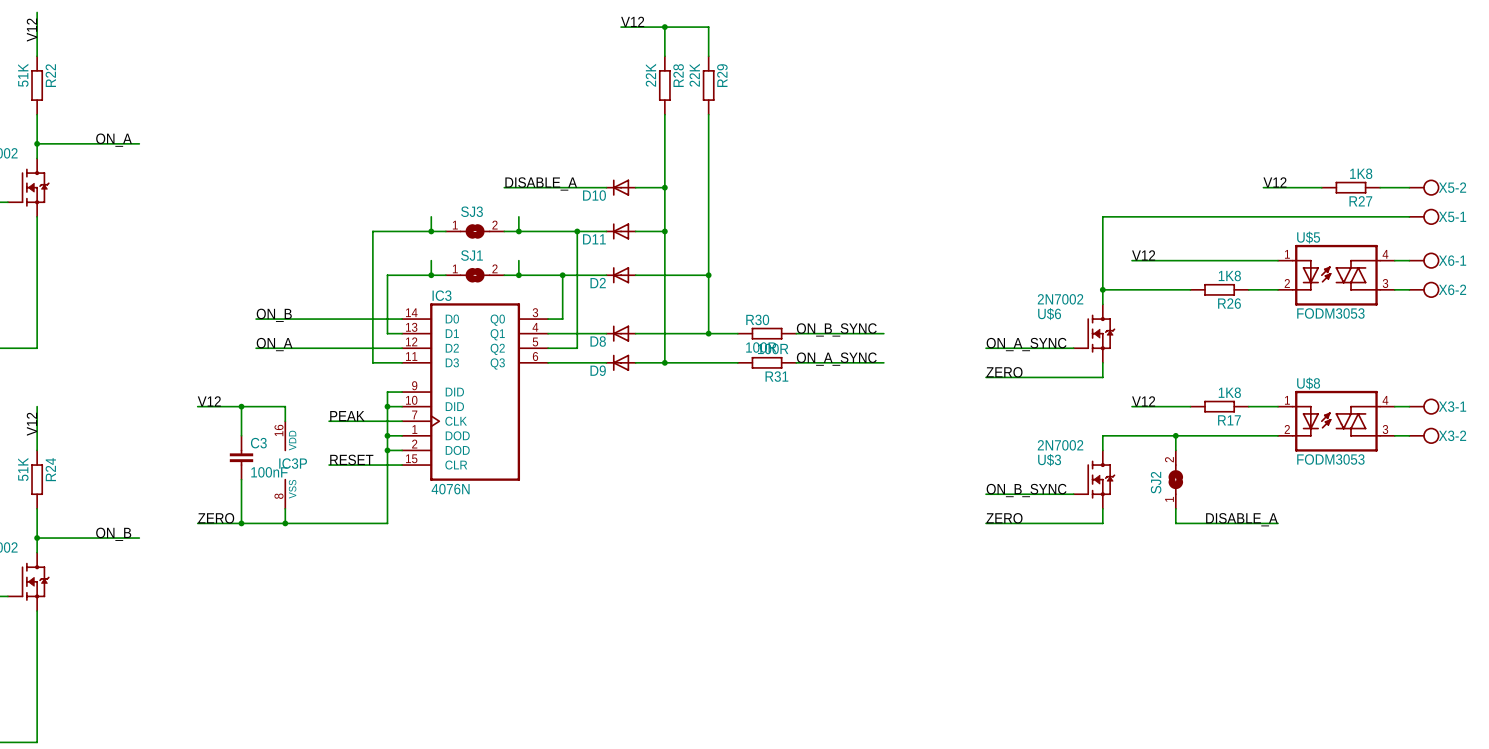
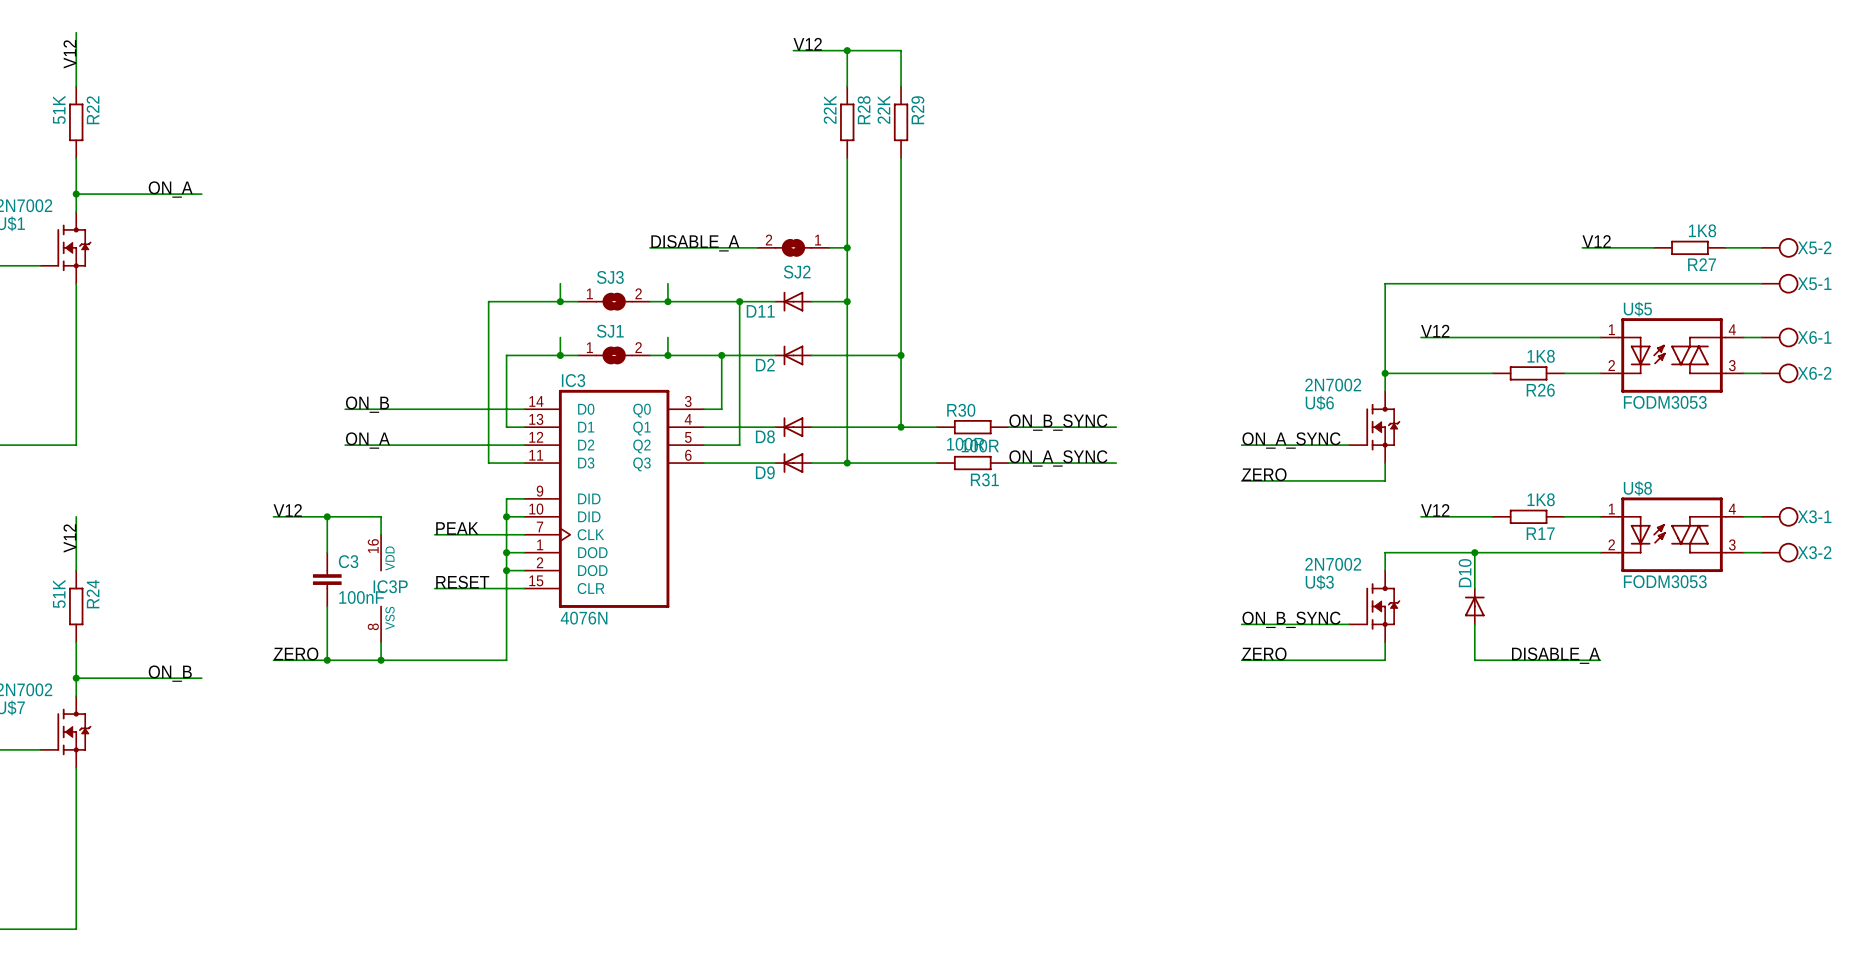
D10 rotation: 0° (621, 187) -> 90° clockwise (1474, 606)
D10 position: (621, 187) -> (1474, 606)
SJ2 rotation: 0° (1175, 479) -> 90° counterclockwise (793, 247)
SJ2 position: (1175, 479) -> (793, 247)

